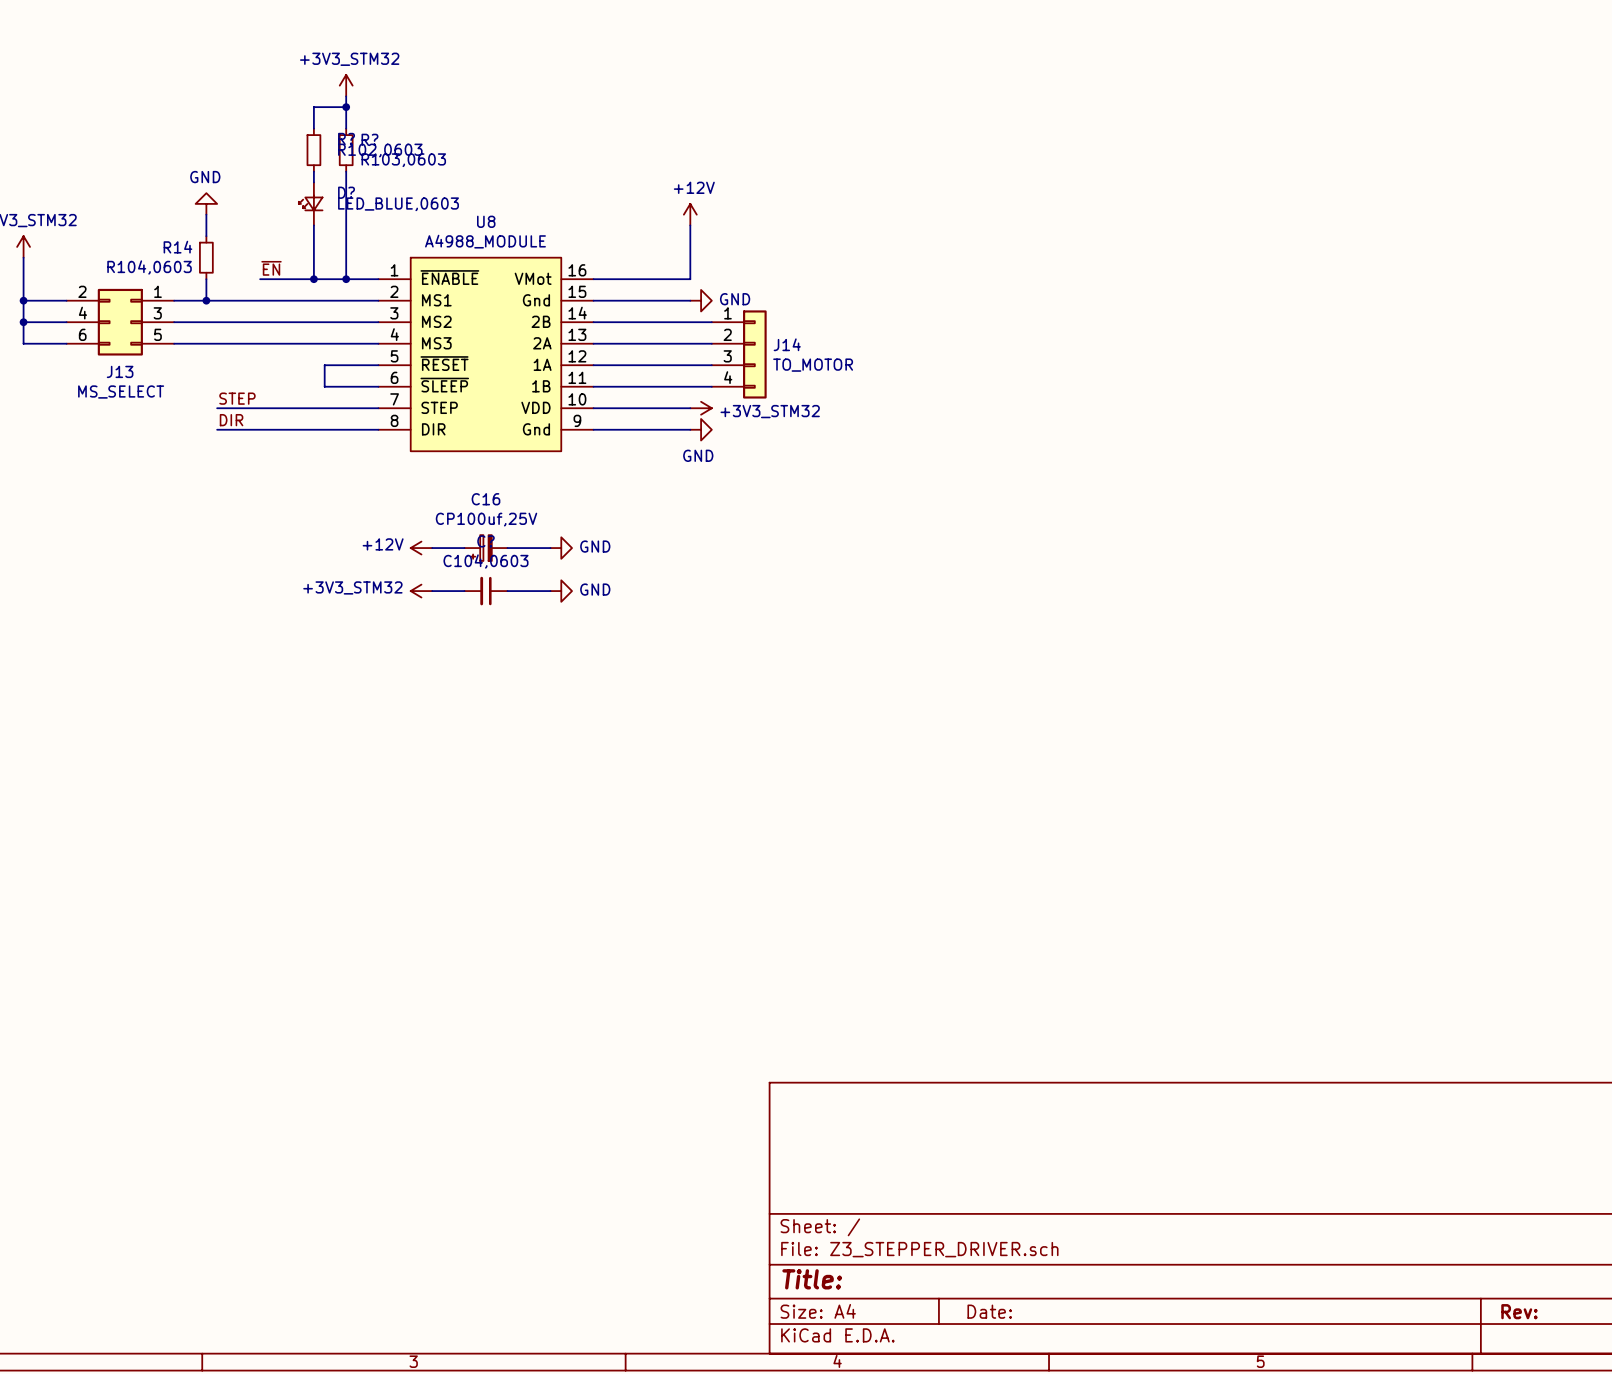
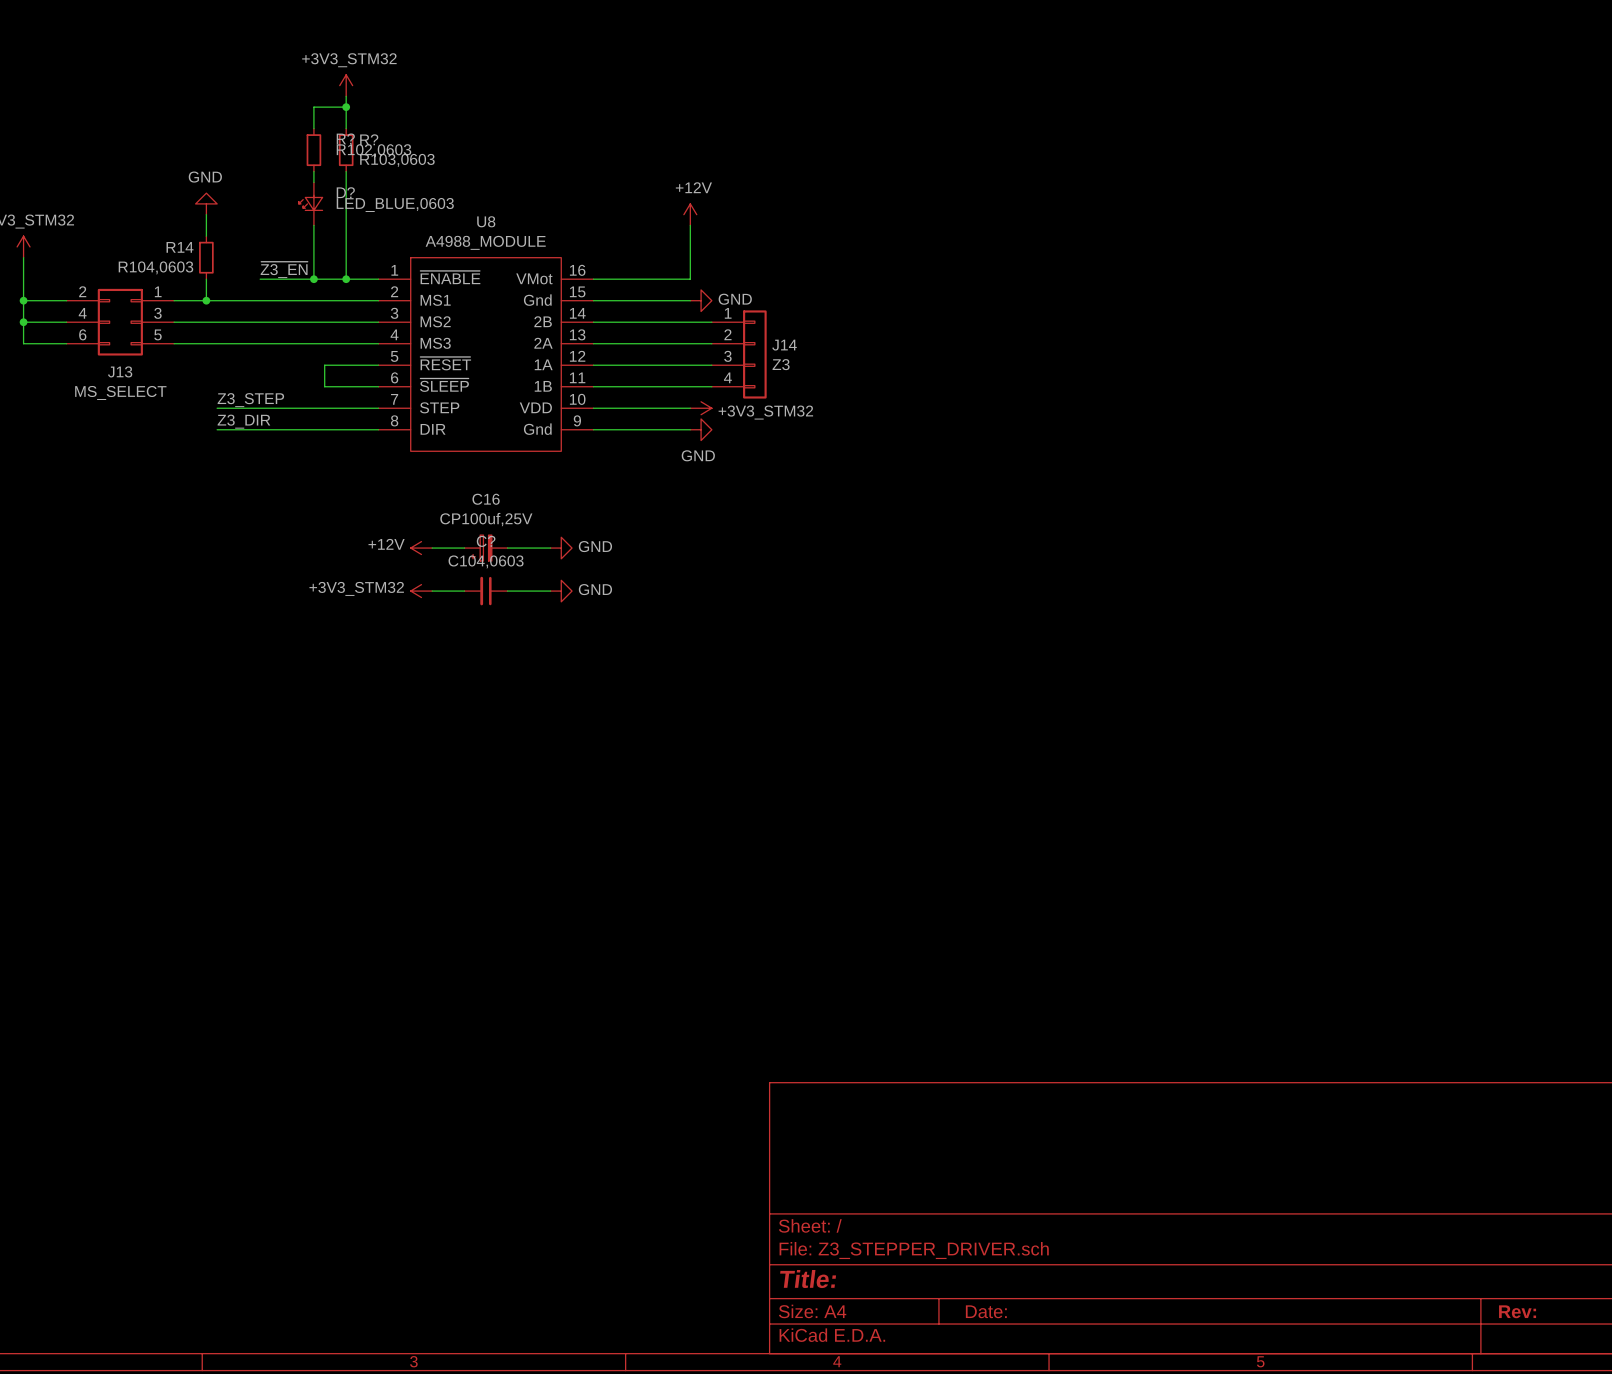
label: ~{EN} (271, 268) -> ~{Z3_EN} (284, 269)
J14 value: TO_MOTOR (813, 365) -> Z3 (781, 364)
label: STEP (237, 398) -> Z3_STEP (250, 400)
label: DIR (231, 420) -> Z3_DIR (243, 421)

